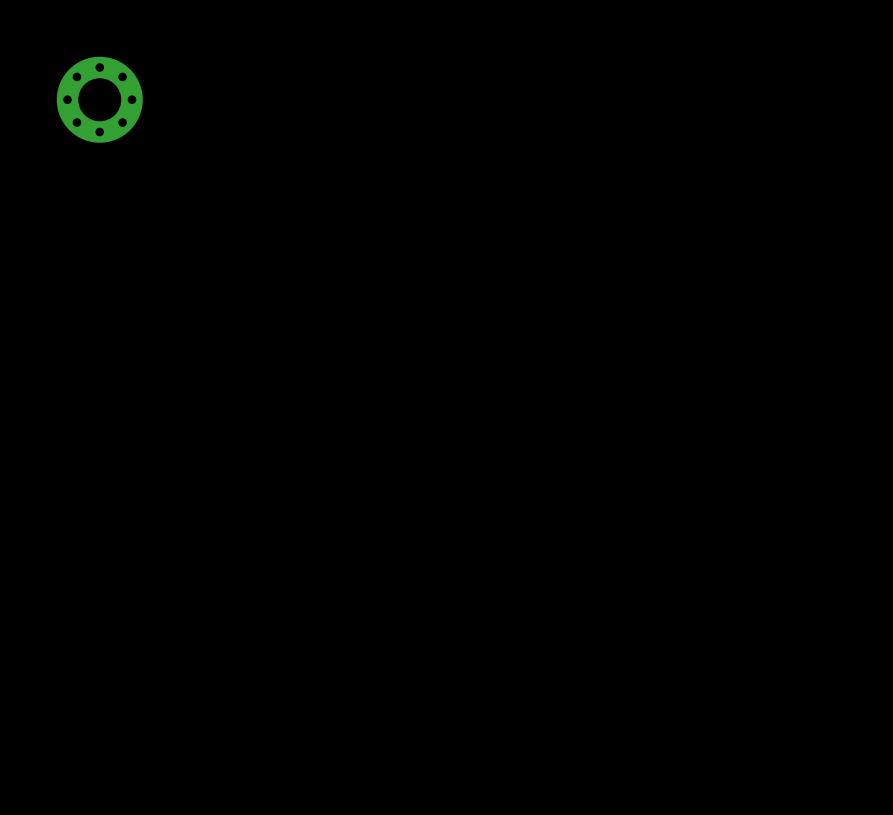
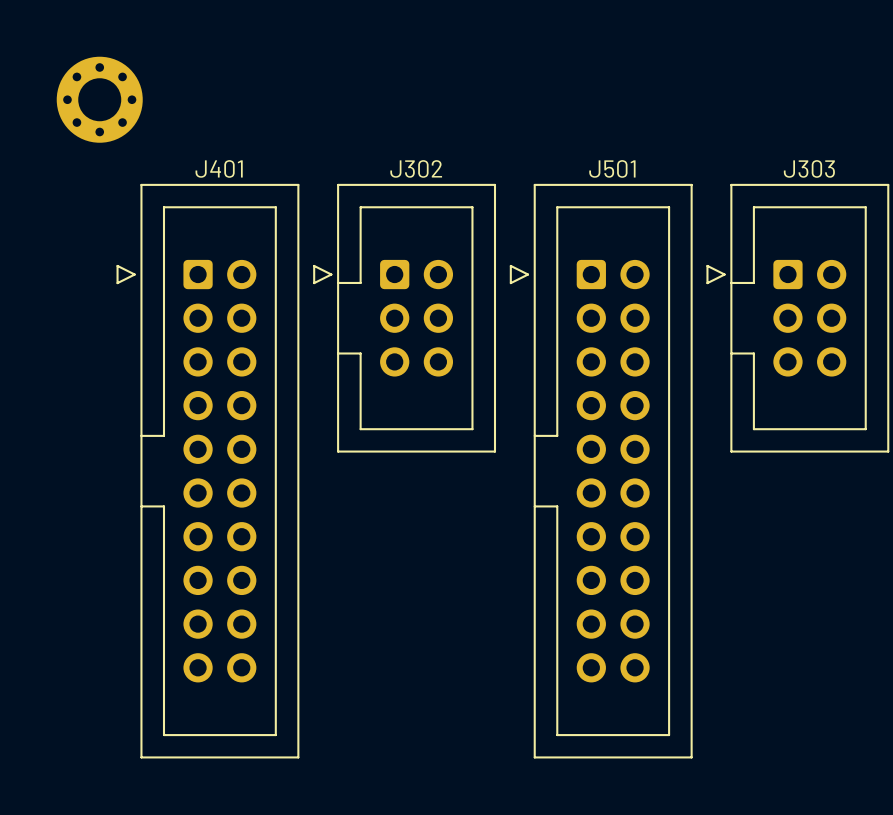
J302: none -> (404, 318)
J303: none -> (797, 318)
J401: none -> (207, 471)
J501: none -> (601, 471)

